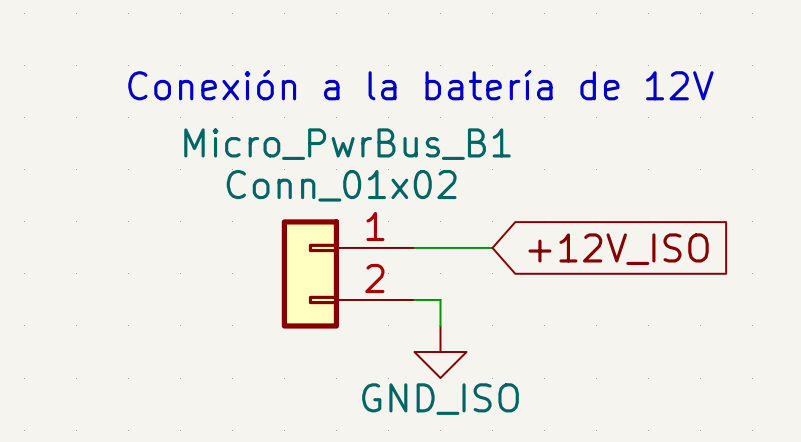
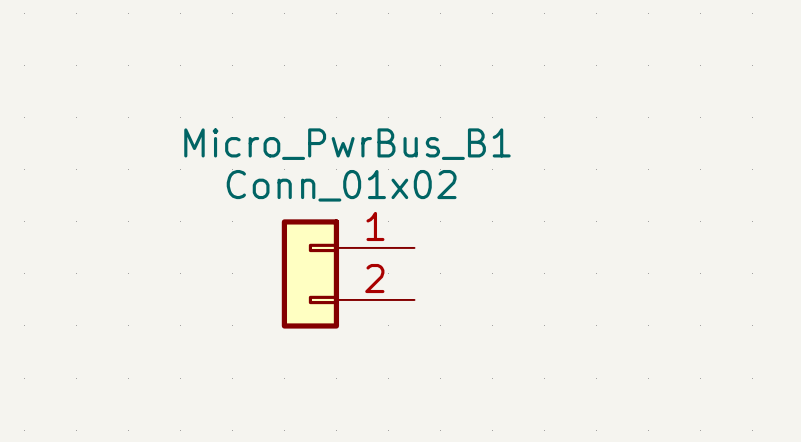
text: Conexión a la batería de 12V (420, 85) -> none
wire: (414, 247) (492, 247) -> none
global label: +12V_ISO (618, 249) -> none
wire: (414, 299) (440, 299) (440, 325) -> none
power symbol: GND_ISO (440, 352) -> none

